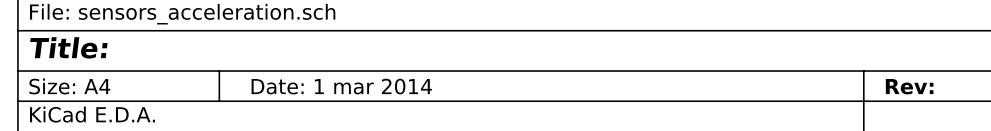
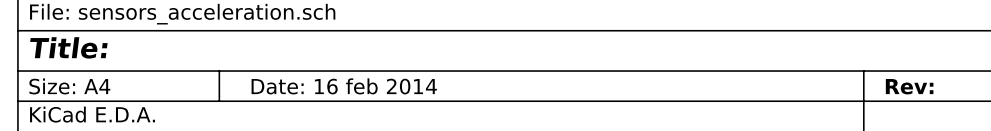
title block: Date: 1 mar 2014 (341, 86) -> Date: 16 feb 2014 (344, 86)

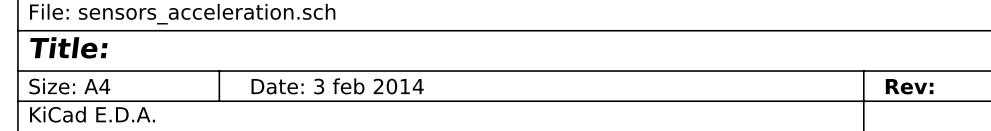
title block: Date: 16 feb 2014 (344, 86) -> Date: 3 feb 2014 (337, 86)

